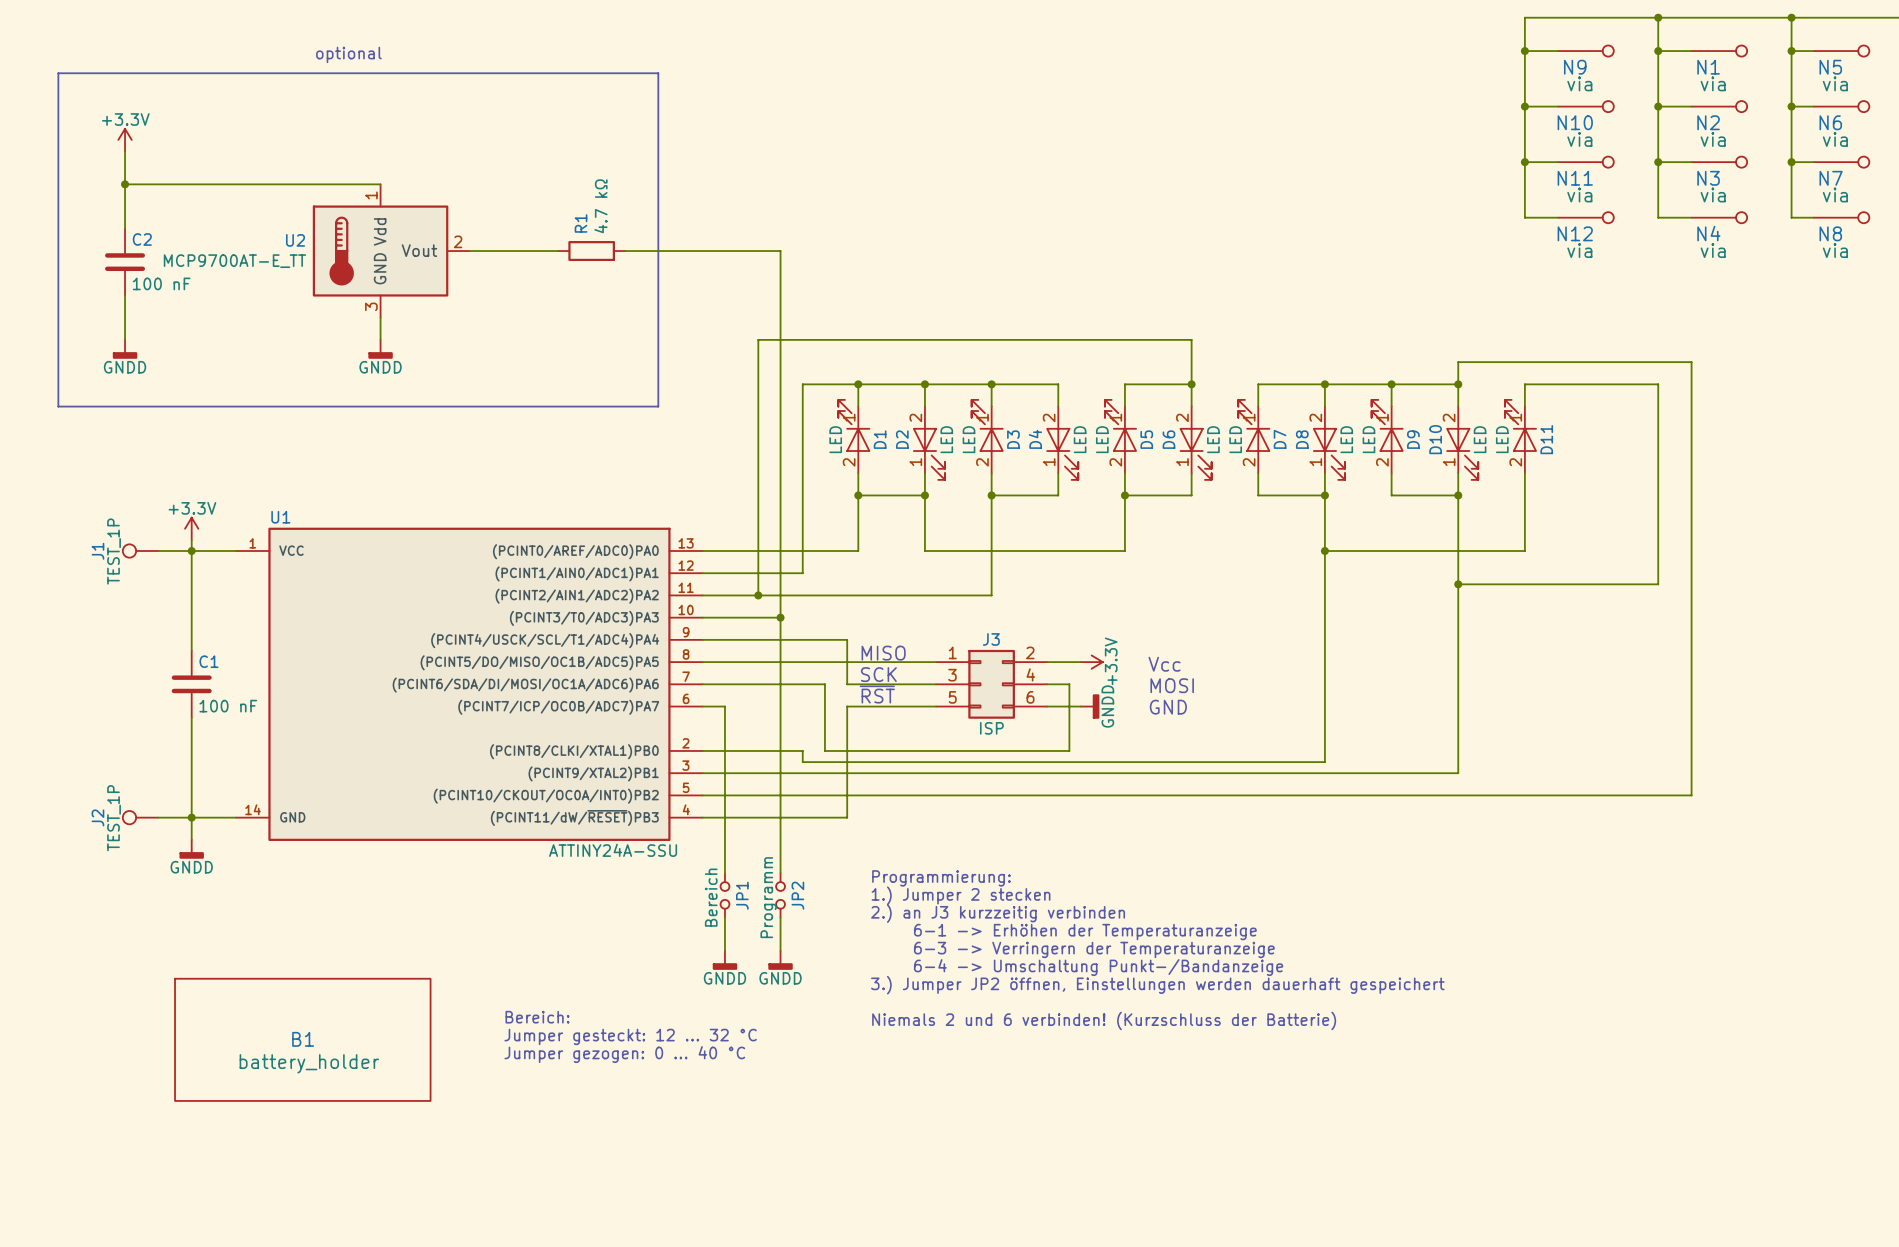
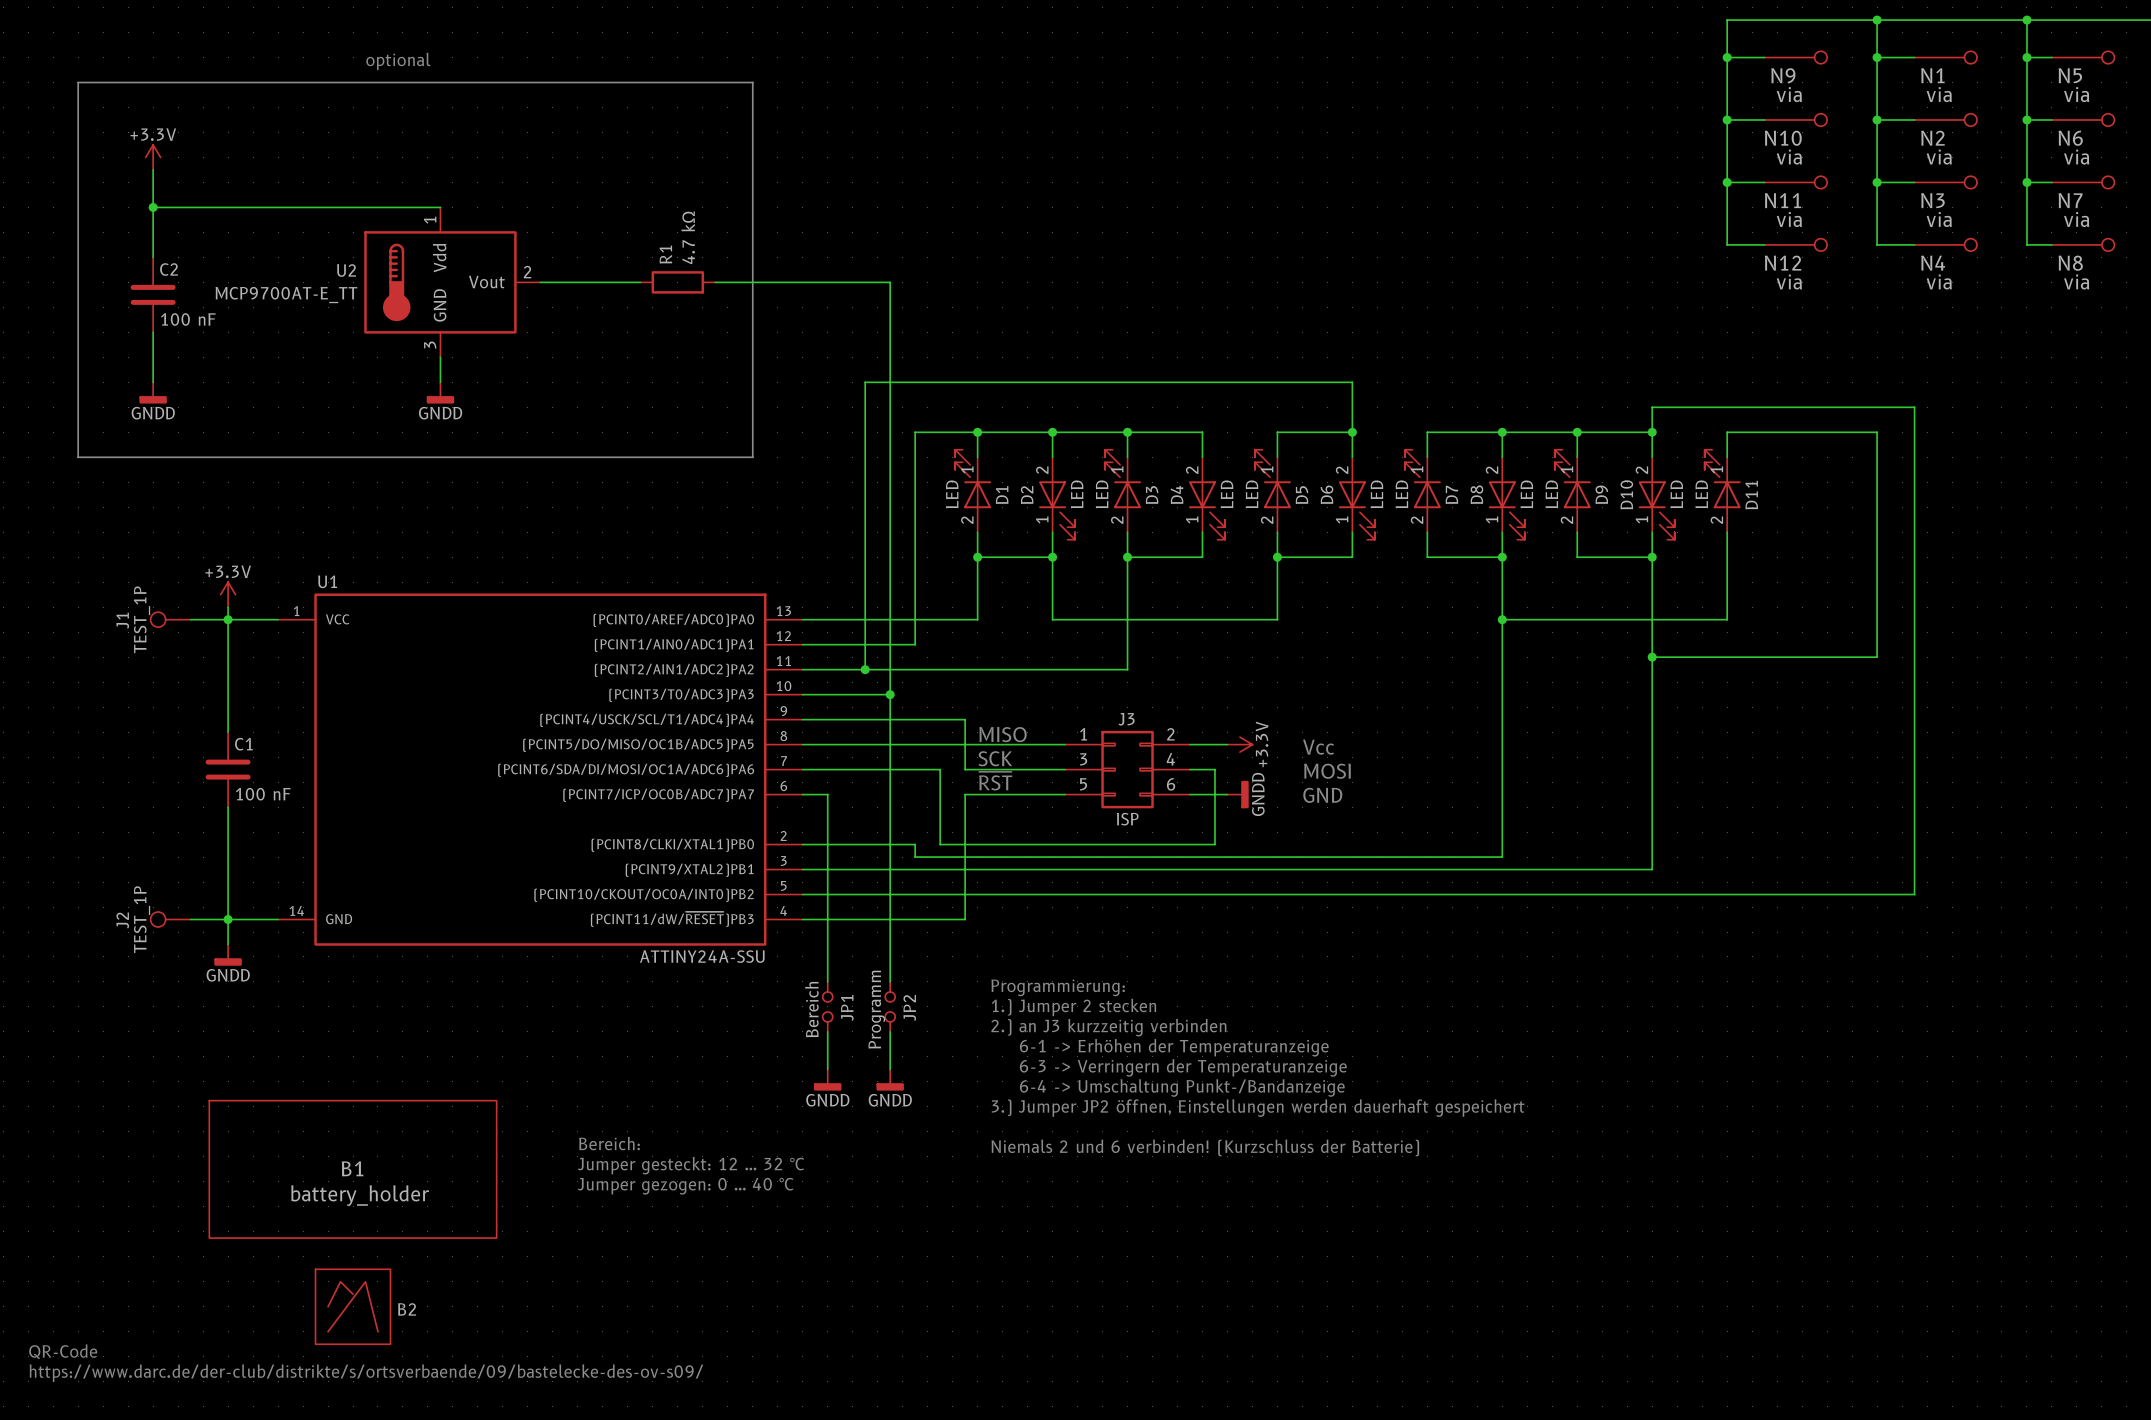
B2: none -> (353, 1306)
text: none -> QR-Code (63, 1351)
text: none -> https://www.darc.de/der-club/distrikte/s/ortsverbaende/09/bastelecke-des-ov-s09/ (366, 1373)

